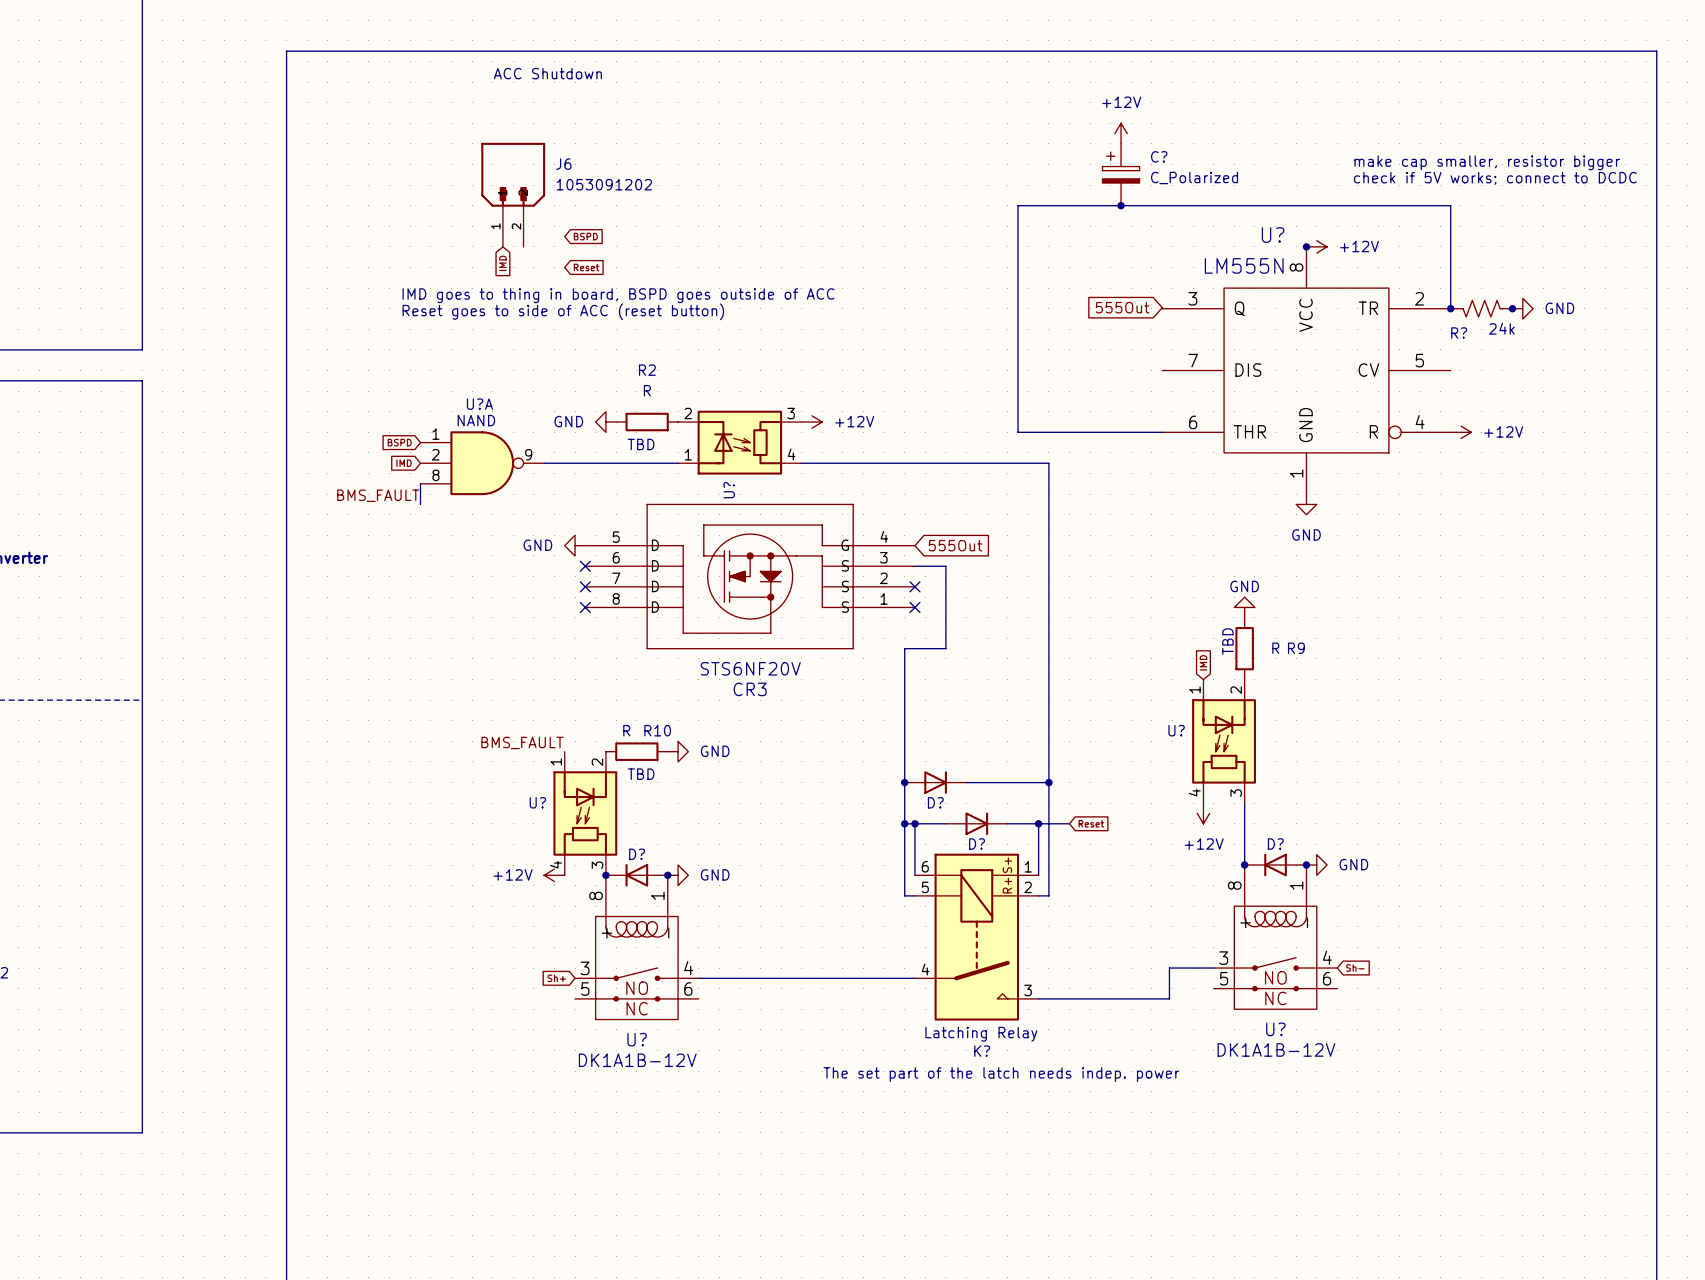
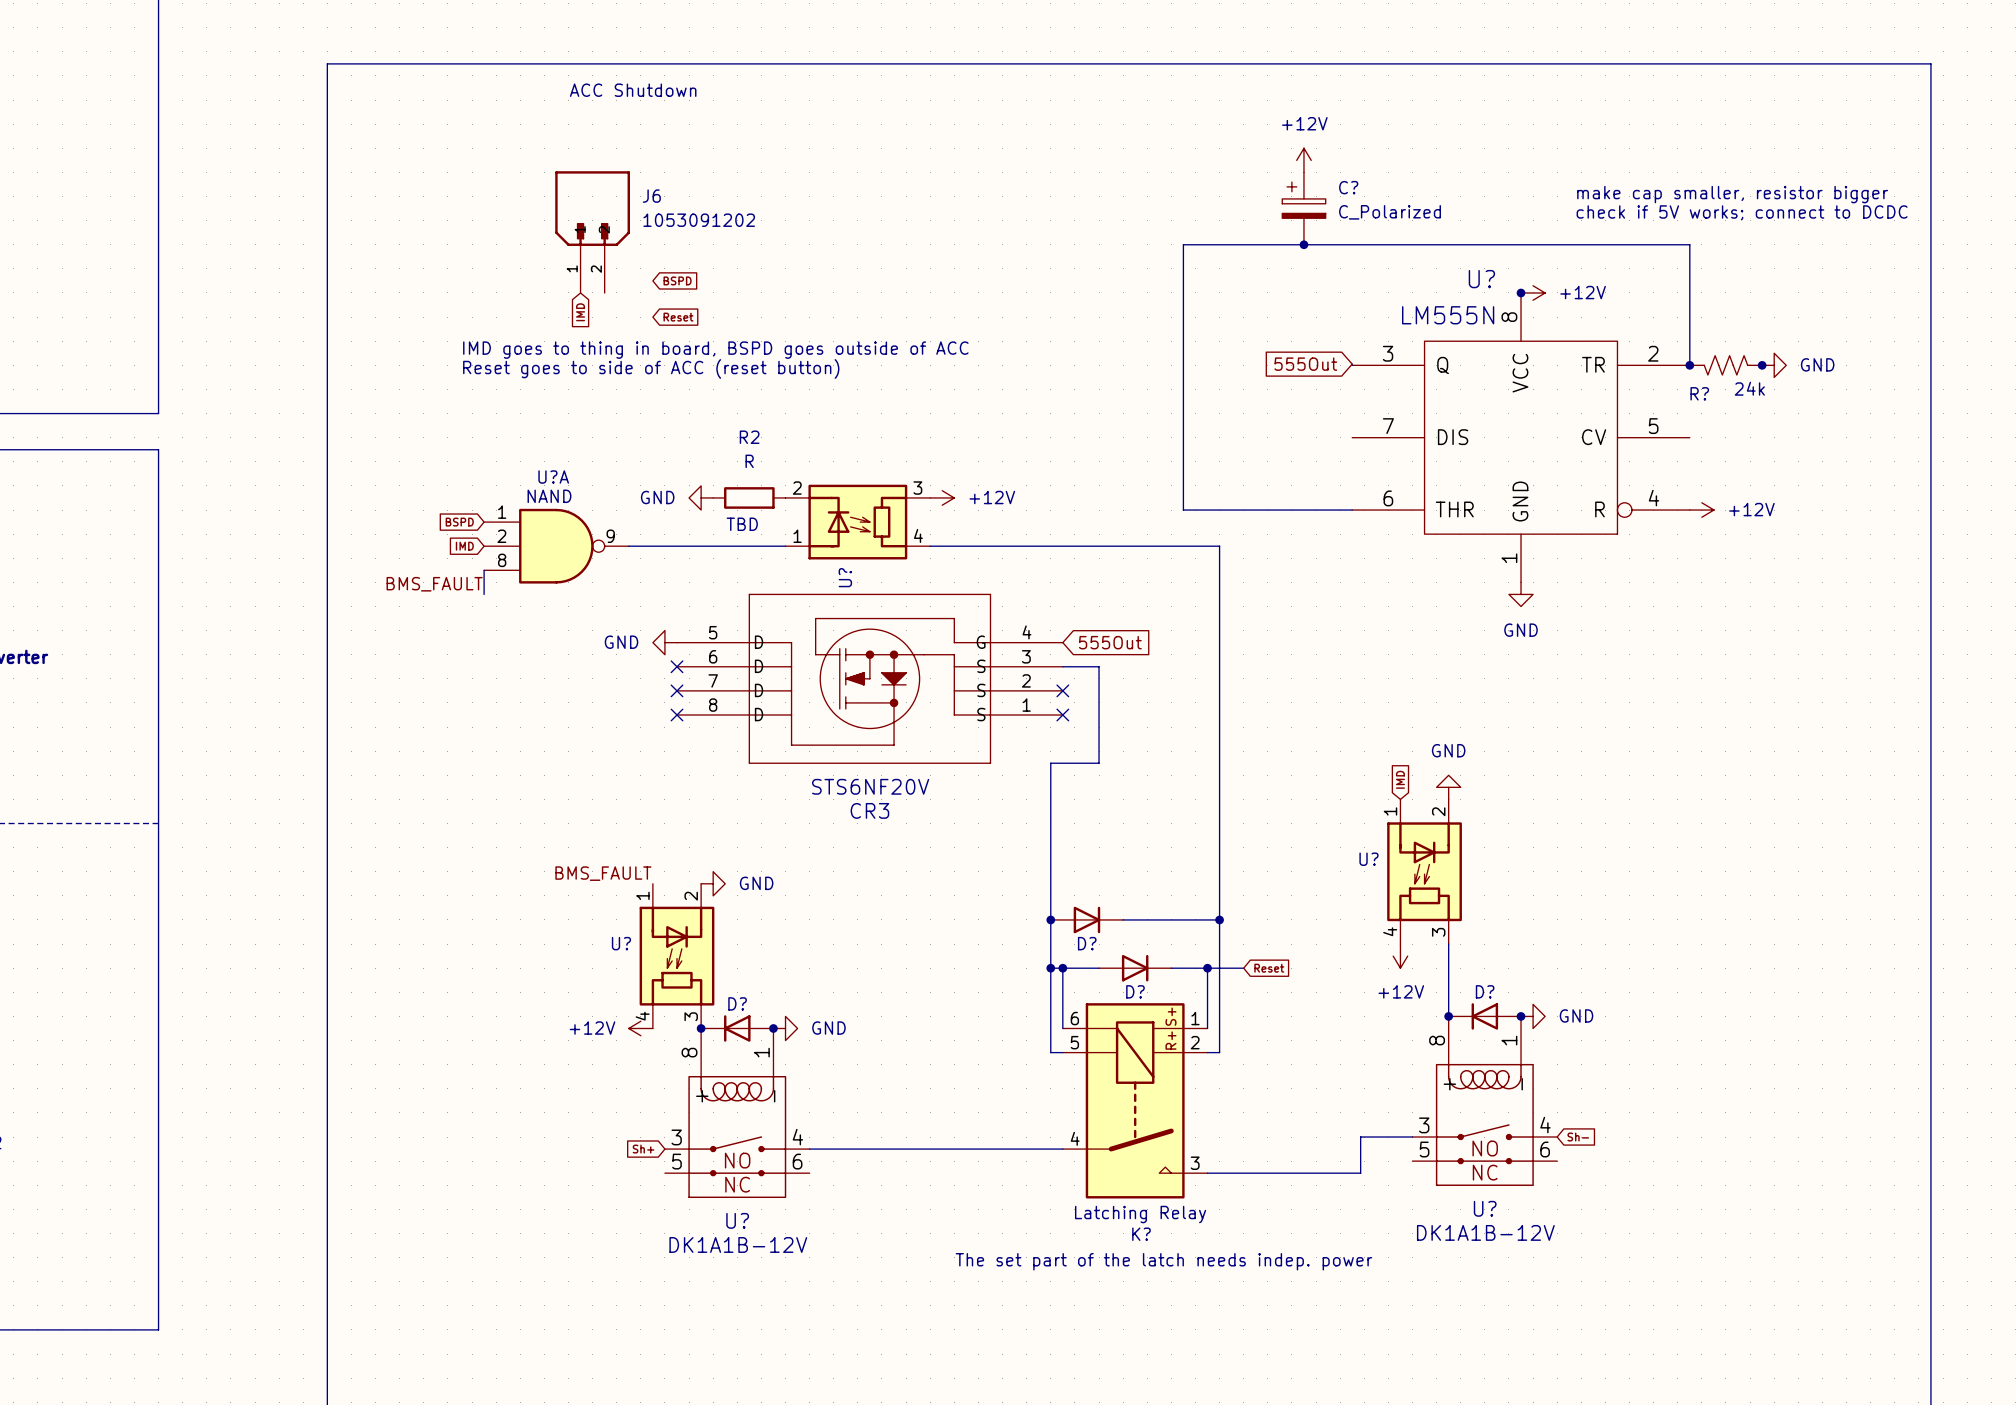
power symbol text position: GND (1244, 586) -> GND (1448, 750)
power symbol position: GND (1244, 607) -> GND (1448, 787)
text: TBD (1227, 641) -> none
R9: R (1244, 648) -> none
R10: R (636, 751) -> none
power symbol position: GND (678, 751) -> GND (713, 883)
text: TBD (641, 774) -> none

